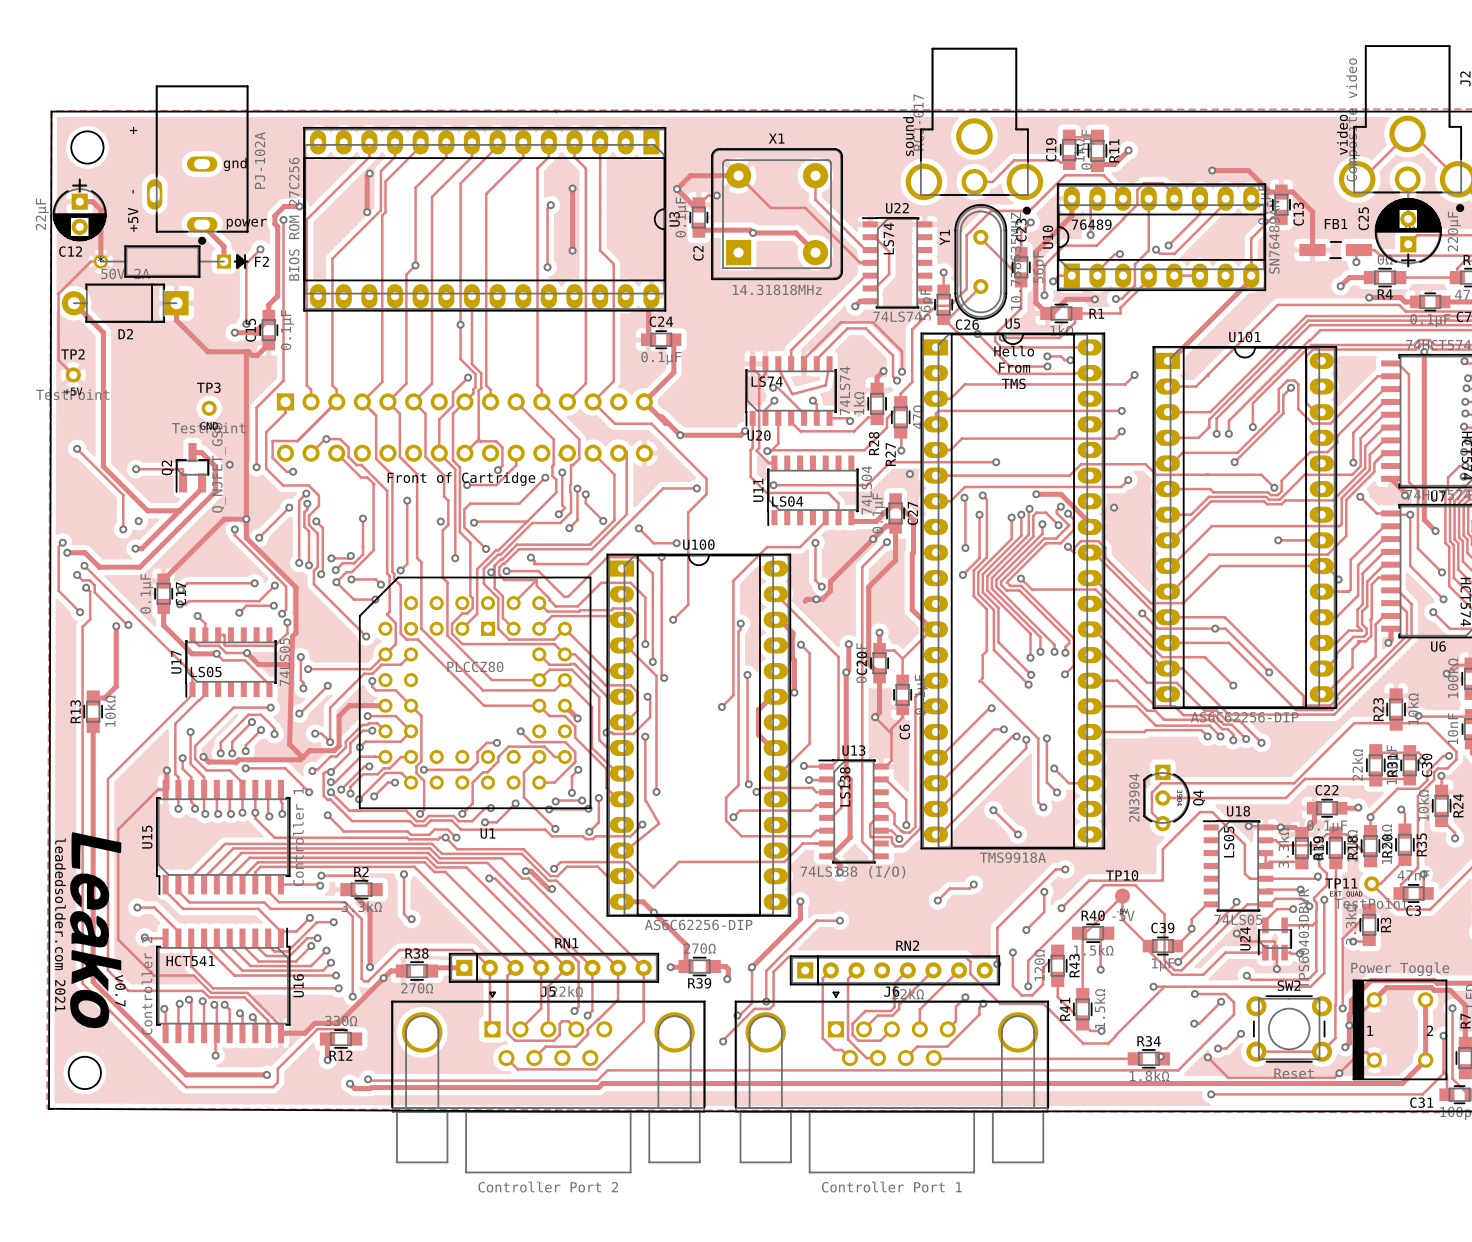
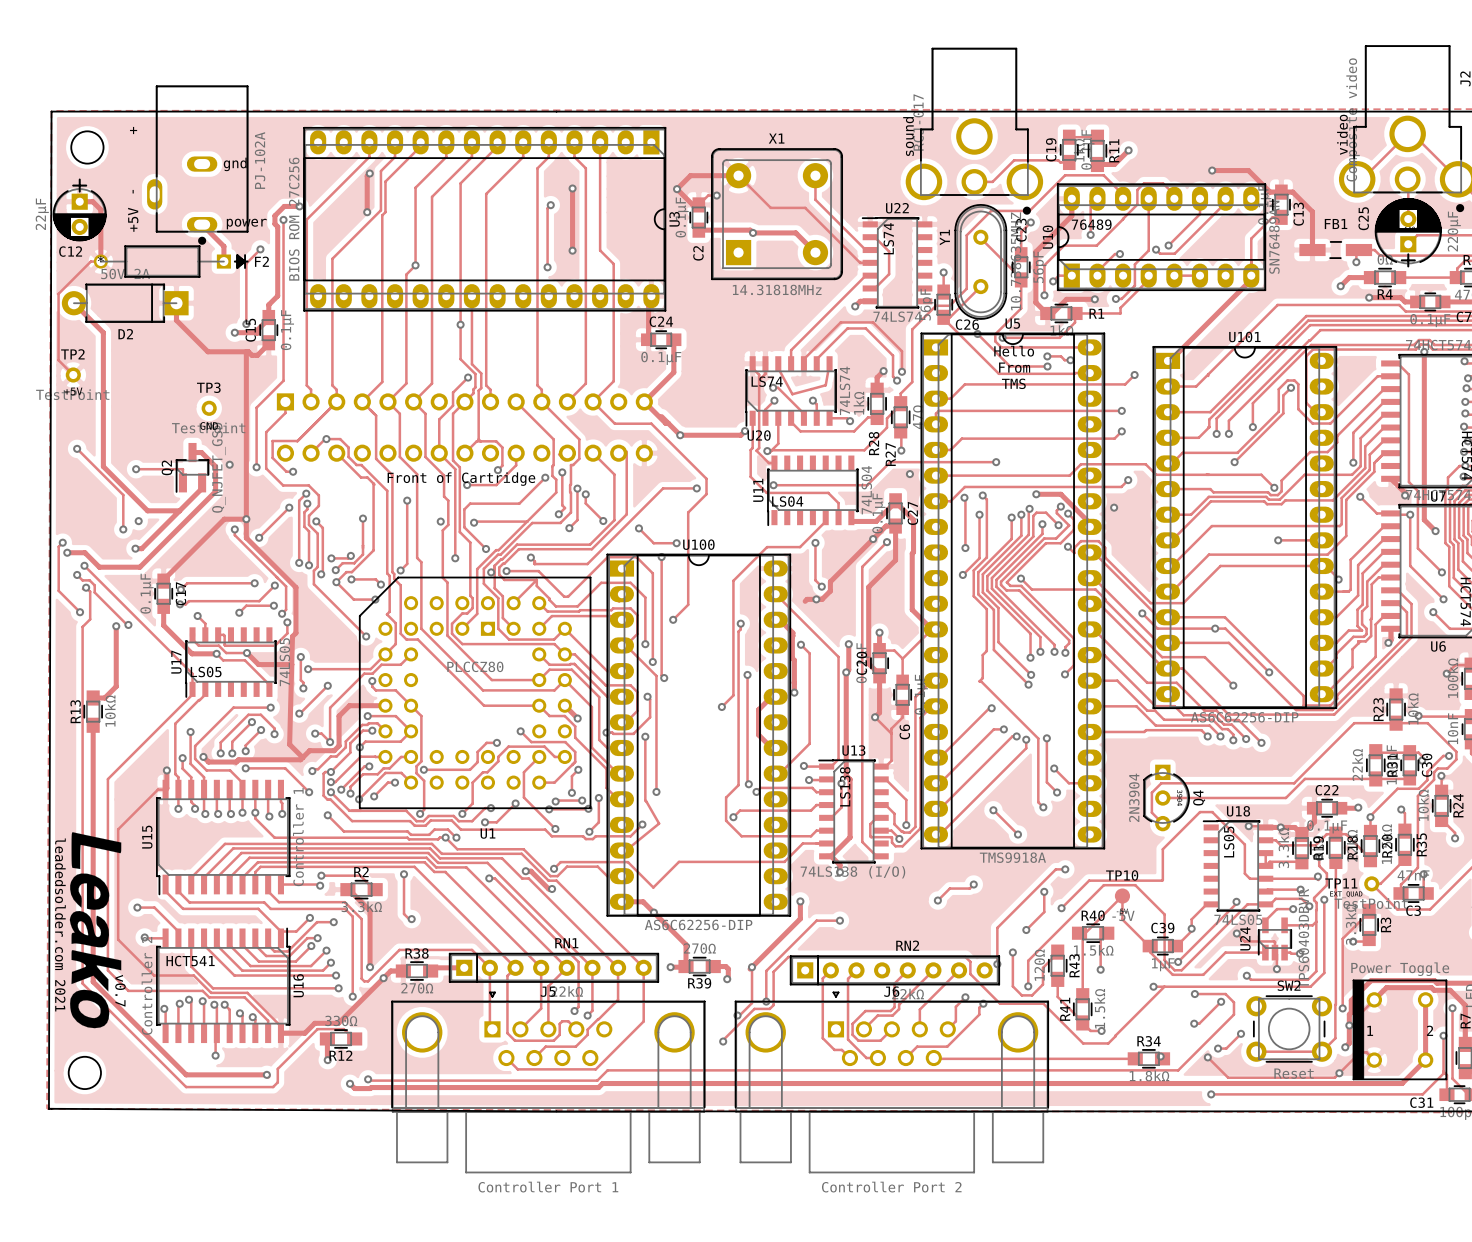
J5 value: Controller Port 2 (548, 1187) -> Controller Port 1 (548, 1187)
J6 value: Controller Port 1 (891, 1187) -> Controller Port 2 (891, 1187)

